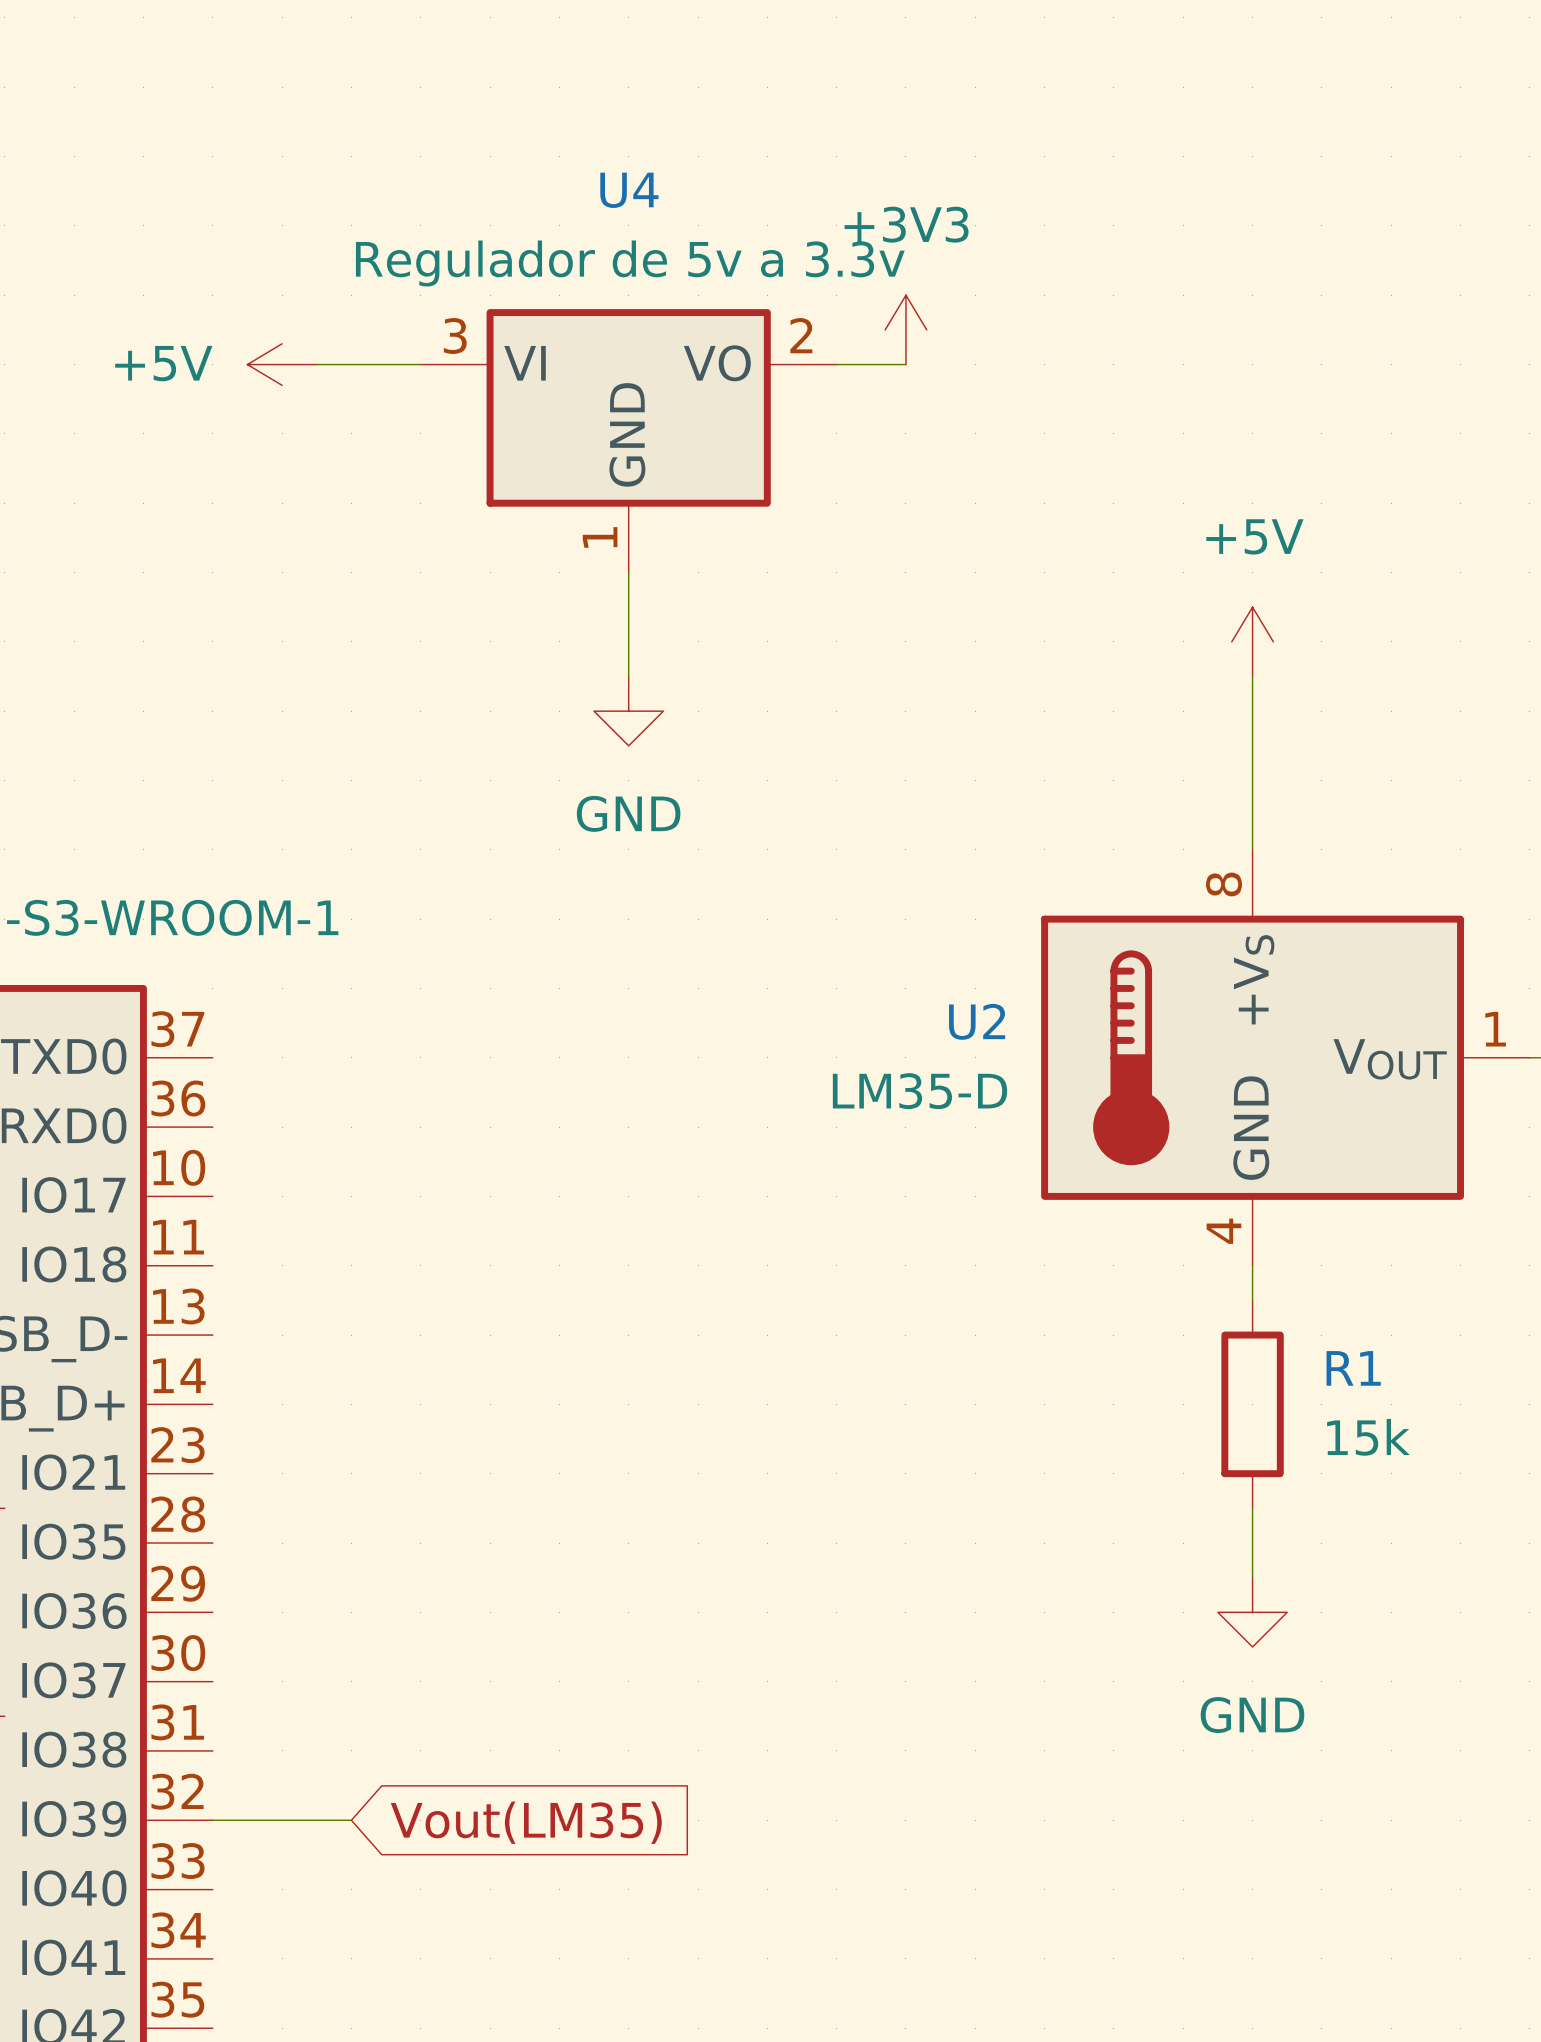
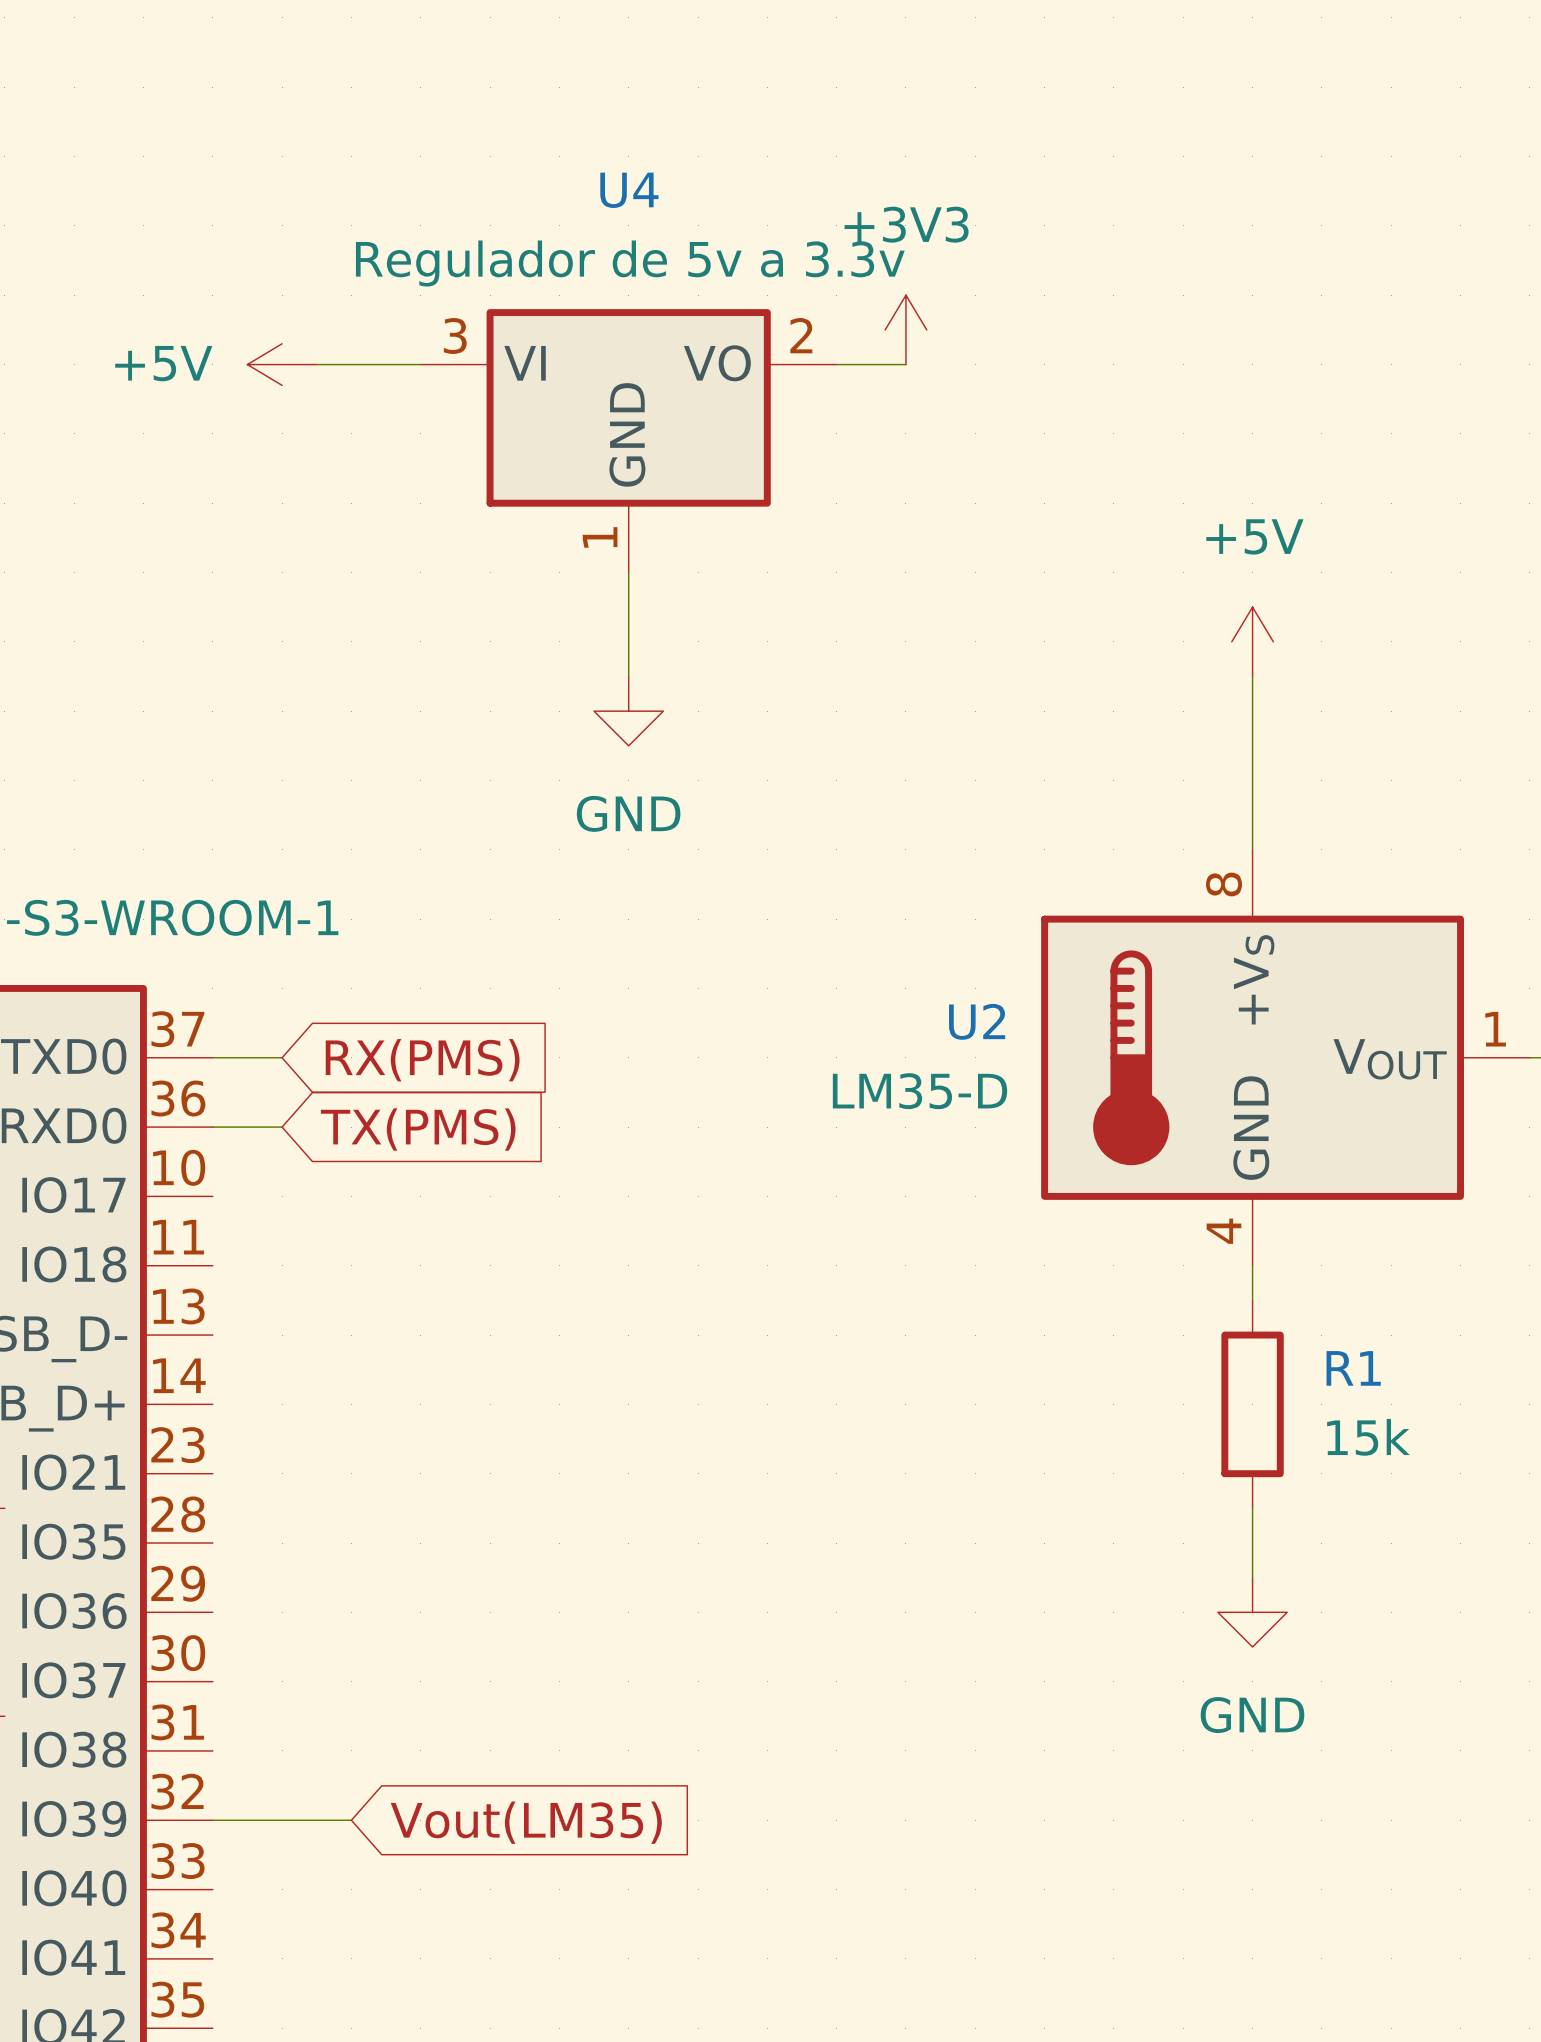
wire: none -> (212, 1057) (282, 1057)
global label: none -> RX(PMS) (422, 1060)
wire: none -> (212, 1127) (282, 1127)
global label: none -> TX(PMS) (418, 1129)

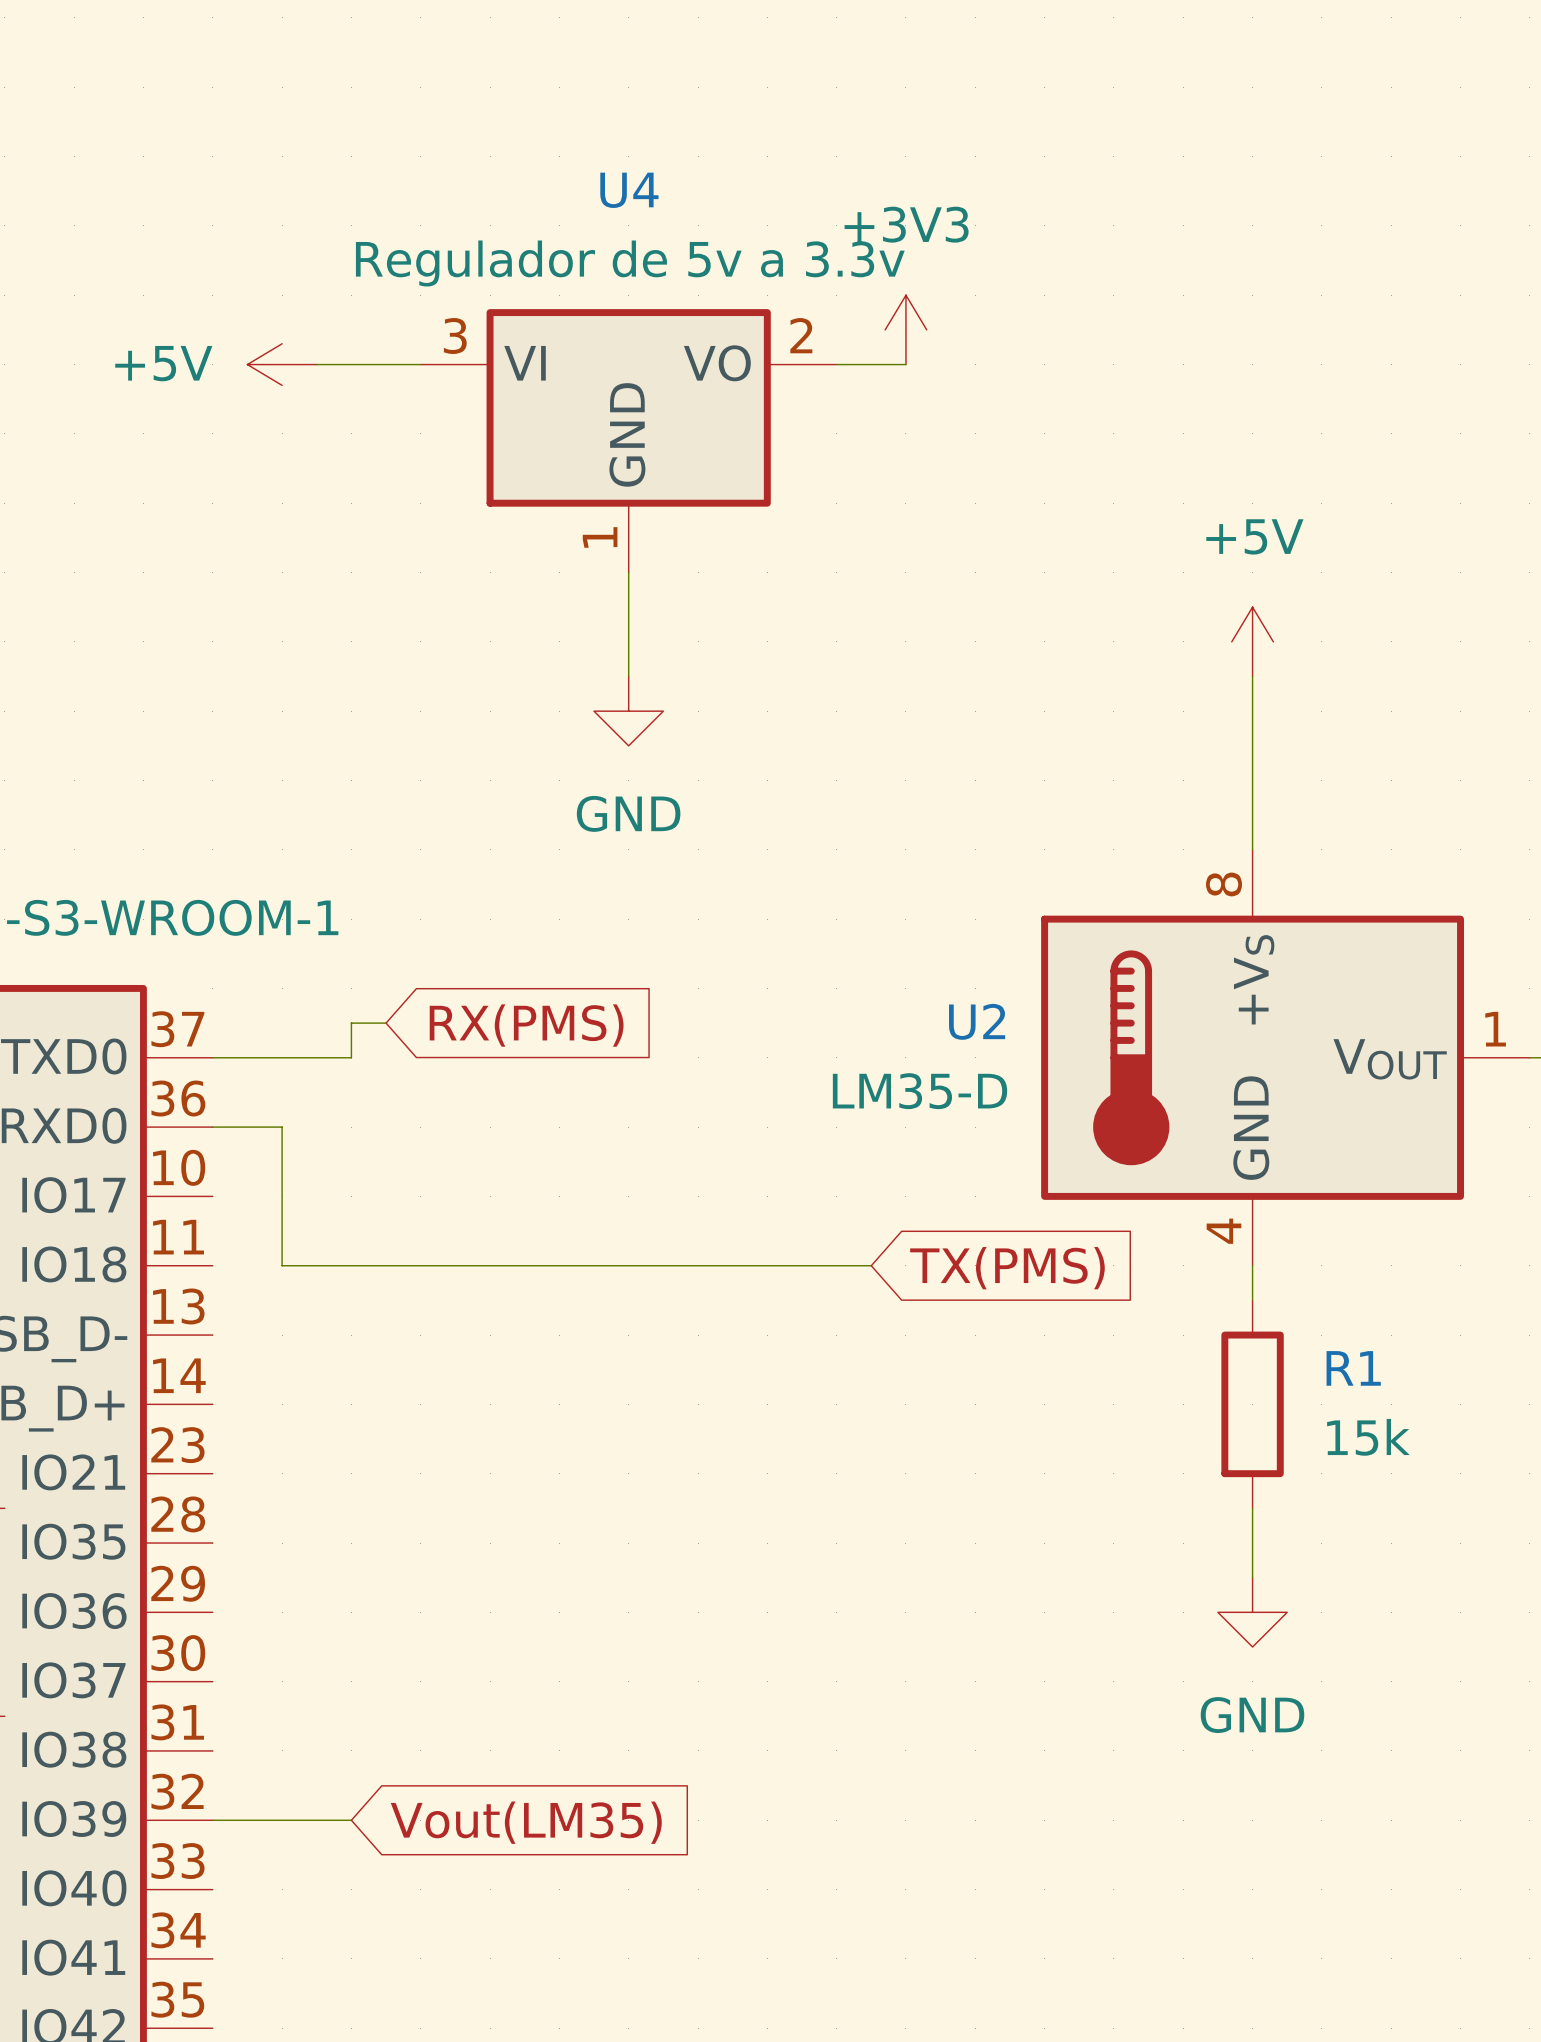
wire: none -> (386, 1023) (351, 1023) (351, 1057) (282, 1057)
global label position: RX(PMS) (422, 1060) -> RX(PMS) (526, 1025)
wire: none -> (282, 1127) (282, 1265) (871, 1265)
global label position: TX(PMS) (418, 1129) -> TX(PMS) (1007, 1268)

